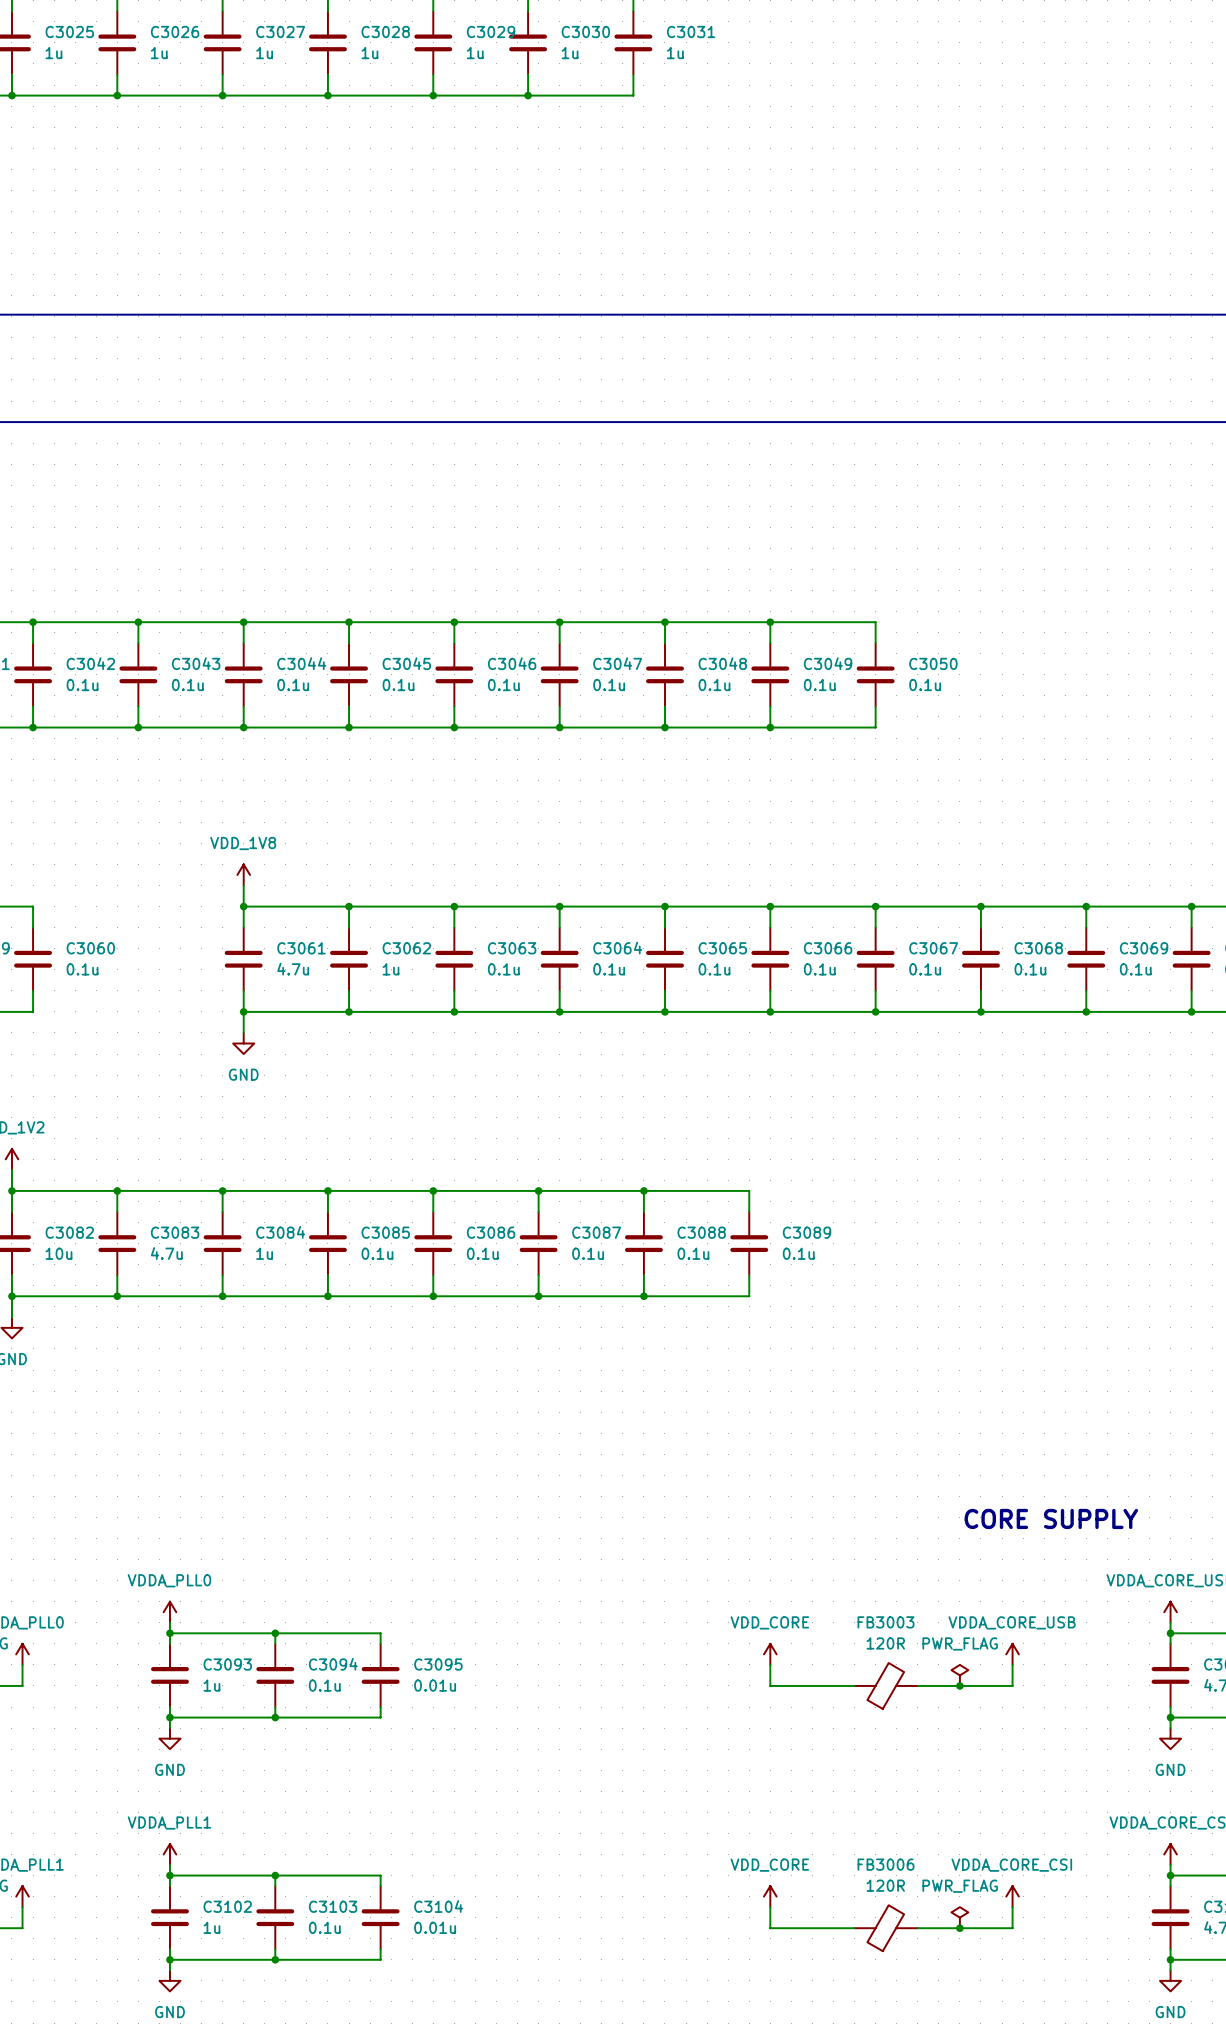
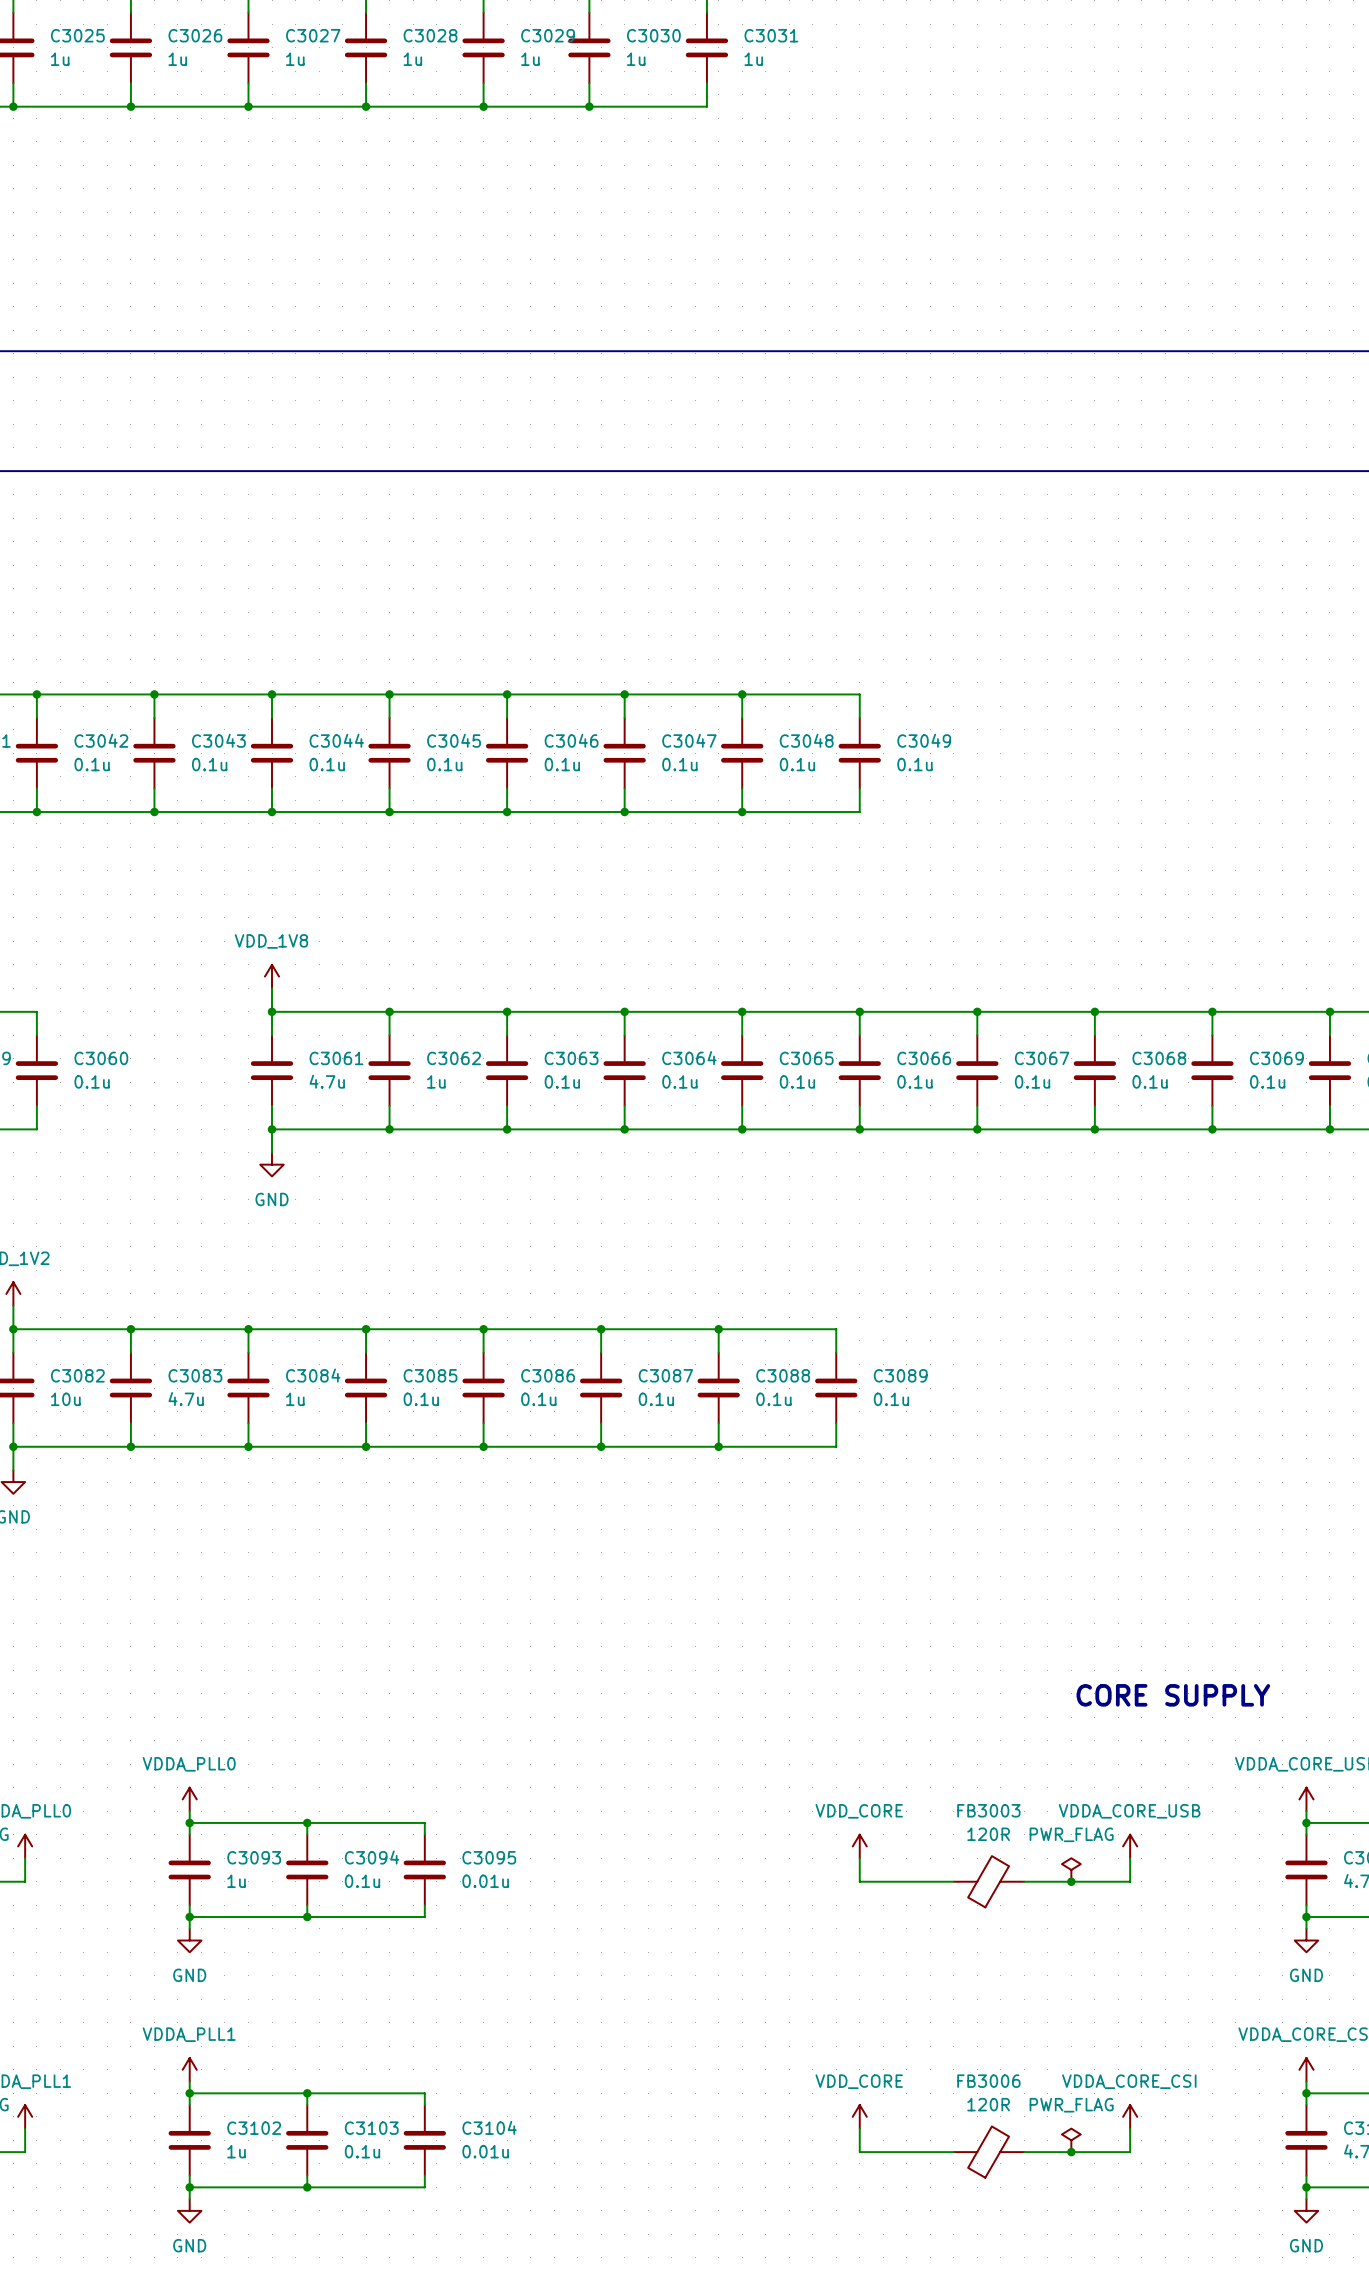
wire: (770, 622) (875, 622) (875, 643) -> none
junction: (770, 622) -> none
C3050: 0.1u (875, 674) -> none
wire: (875, 706) (875, 727) (770, 727) -> none
junction: (770, 727) -> none

